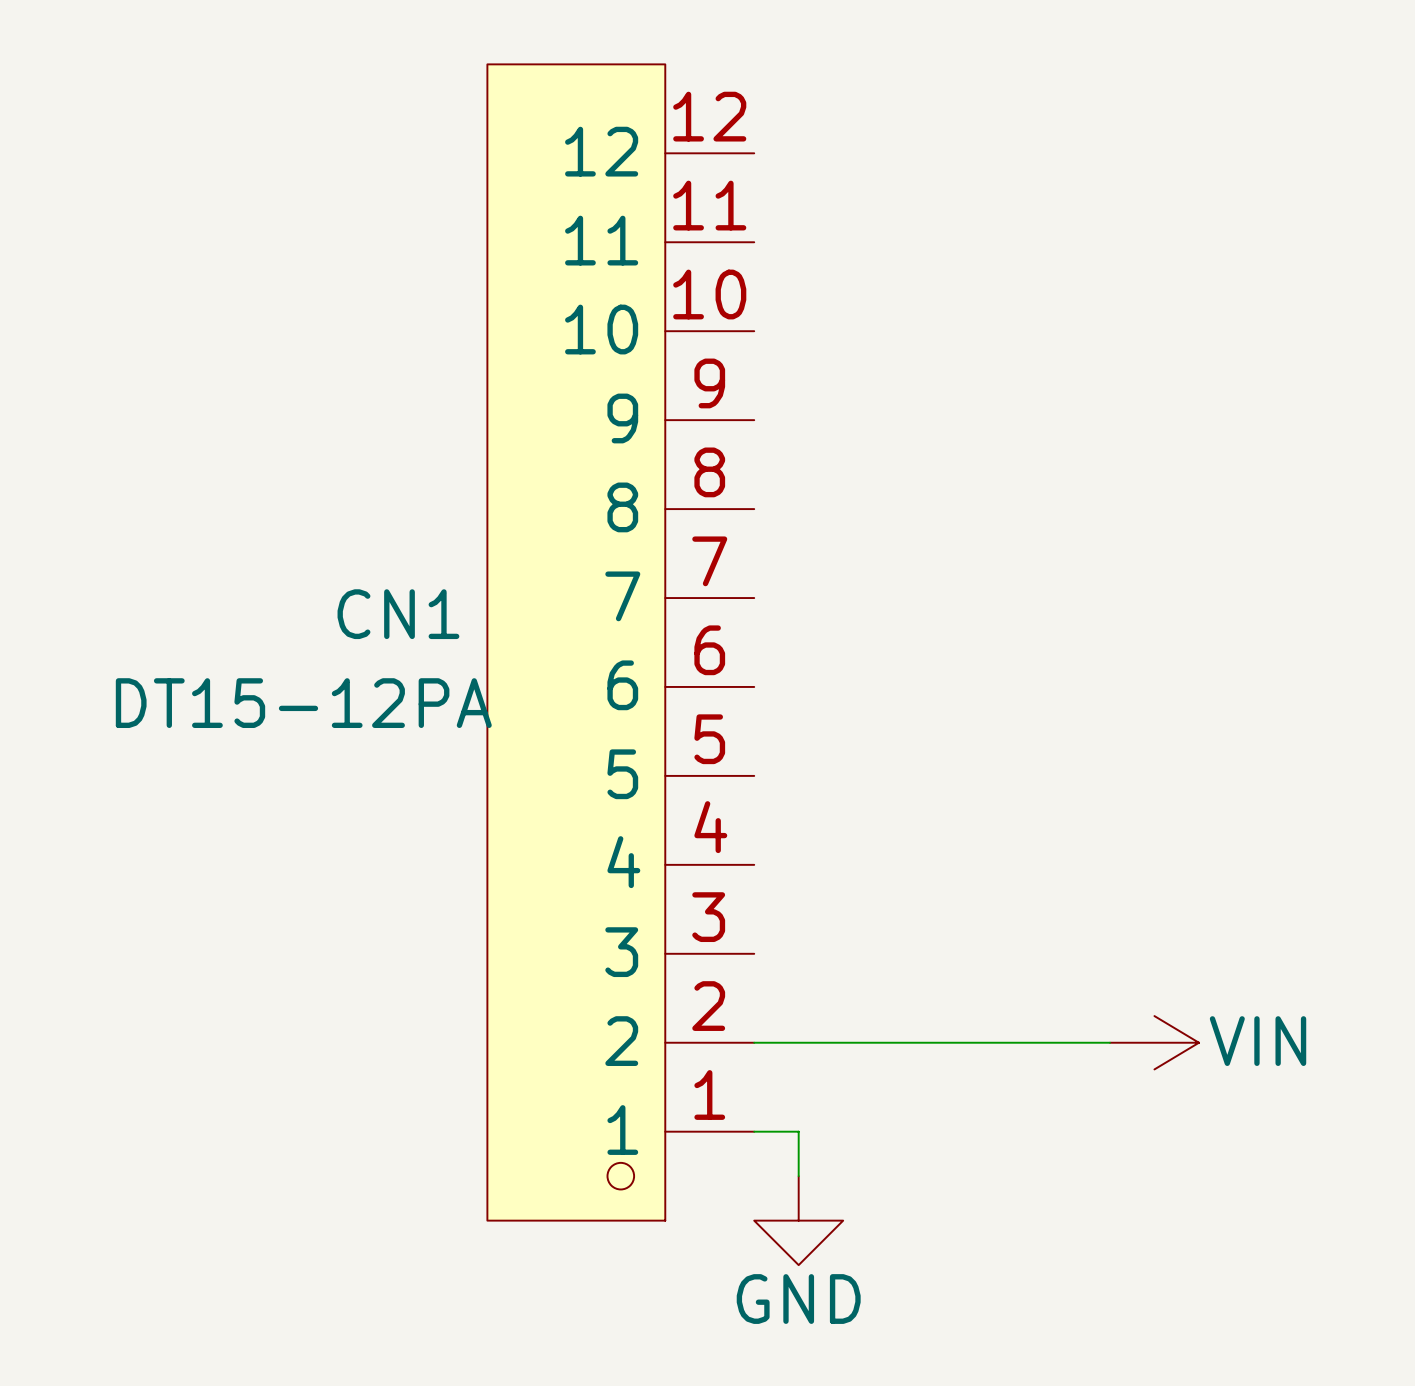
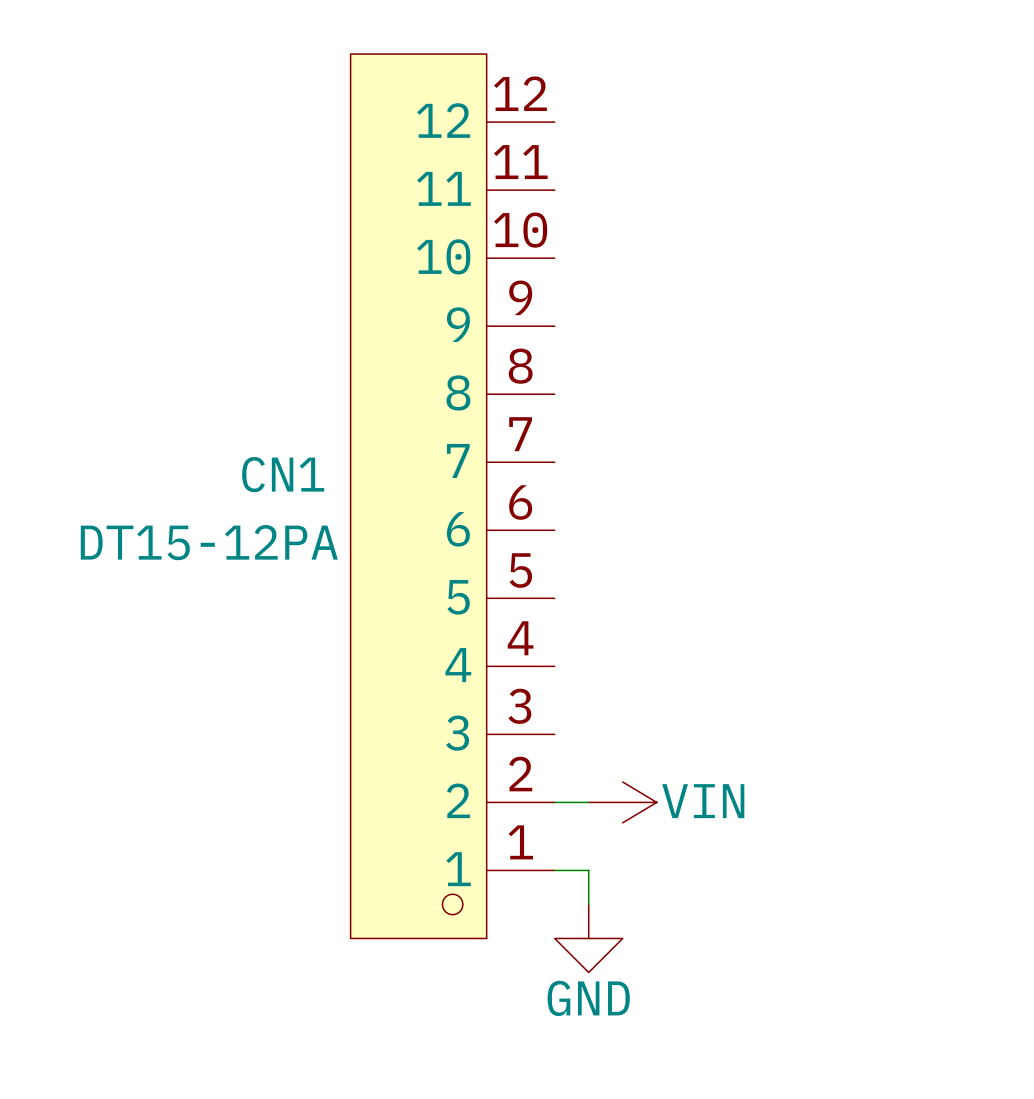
wire: (798, 1042) (1109, 1042) -> none
power symbol position: VIN (1154, 1042) -> VIN (622, 802)

